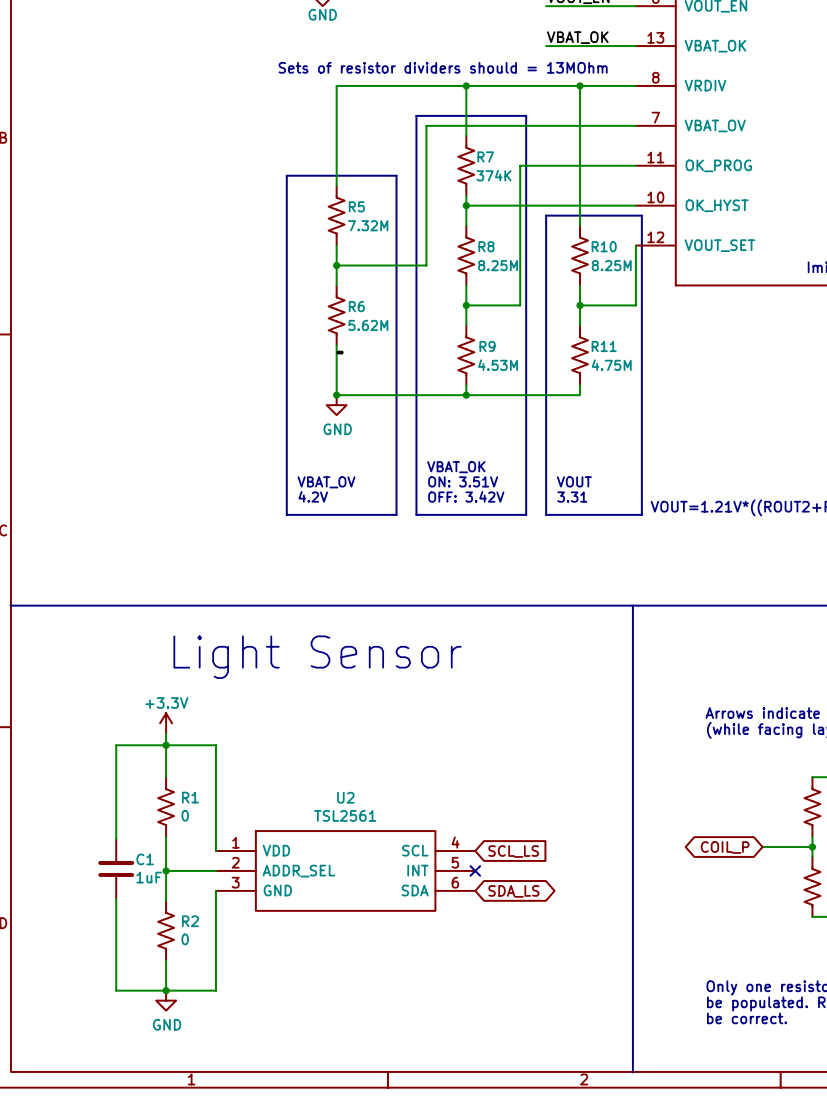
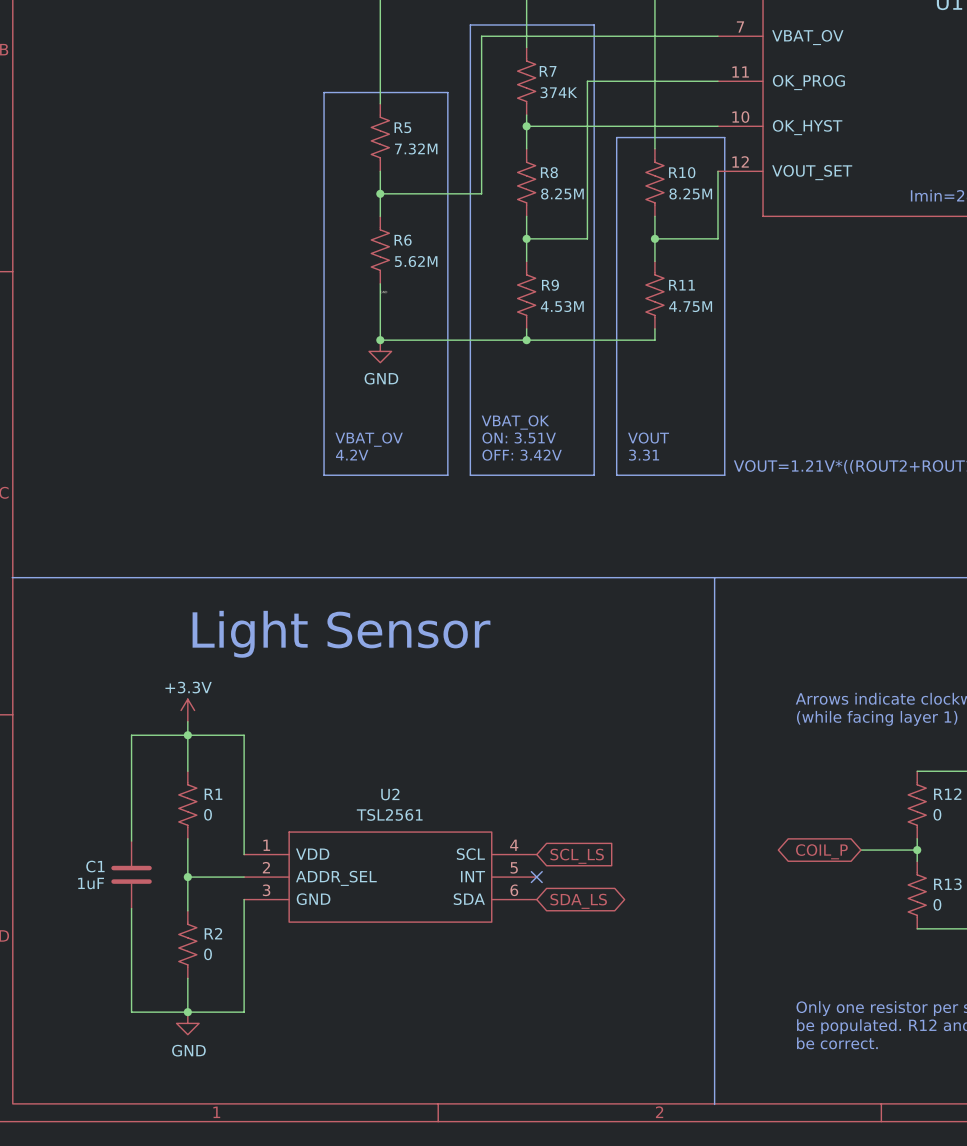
C1 name position: C1 (145, 859) -> C1 (95, 866)
C1 value position: 1uF (149, 877) -> 1uF (91, 883)

